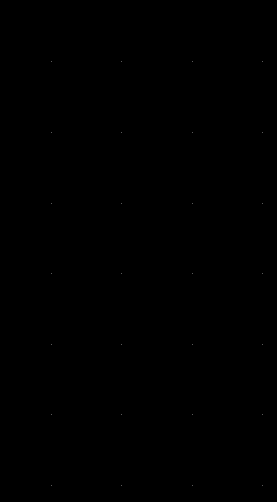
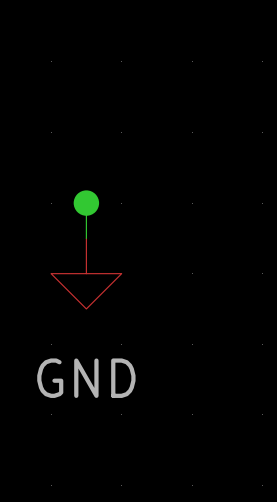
wire: none -> (86, 203) (86, 238)
junction: none -> (86, 203)
power symbol: none -> GND (86, 273)

